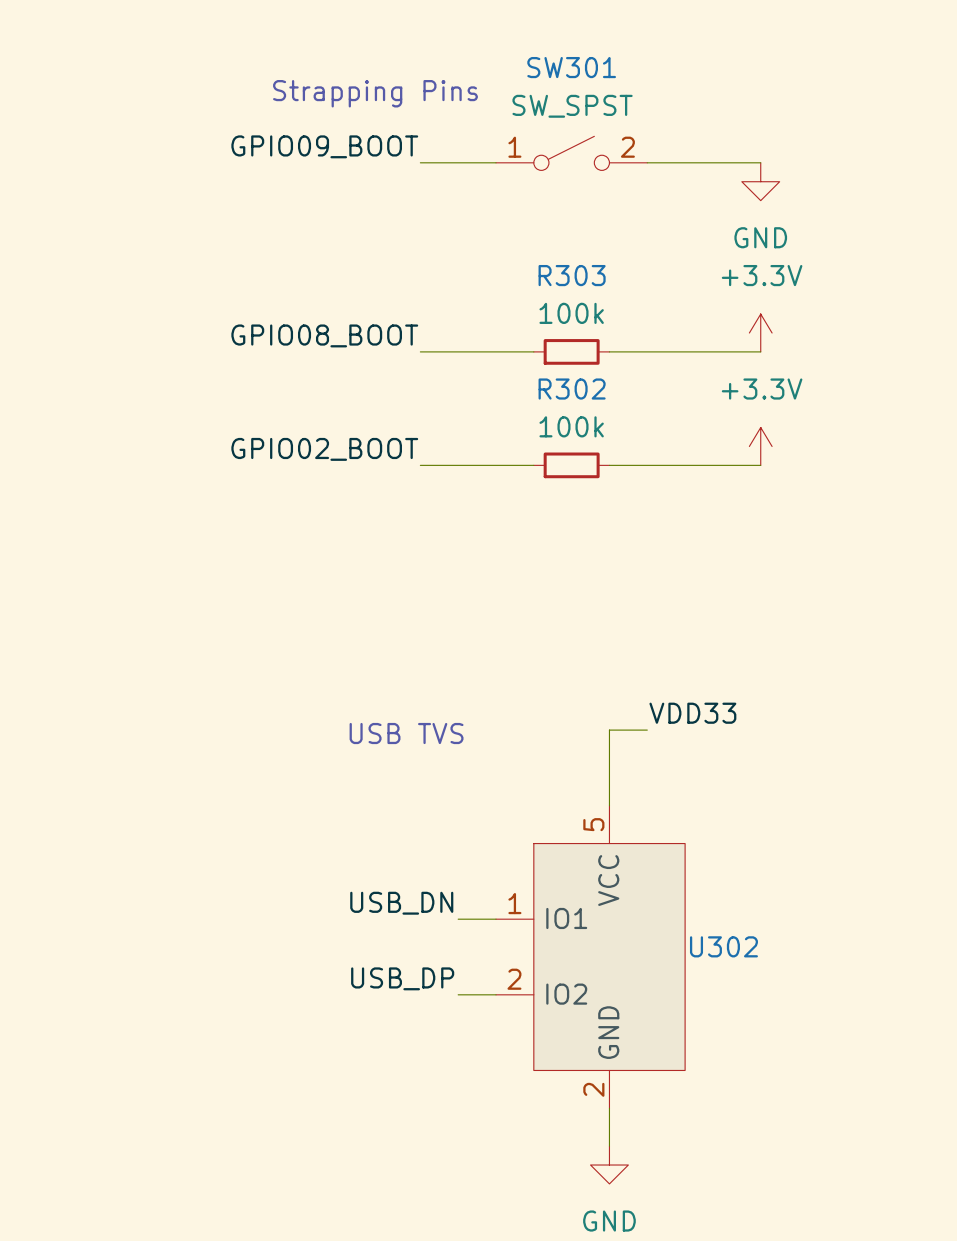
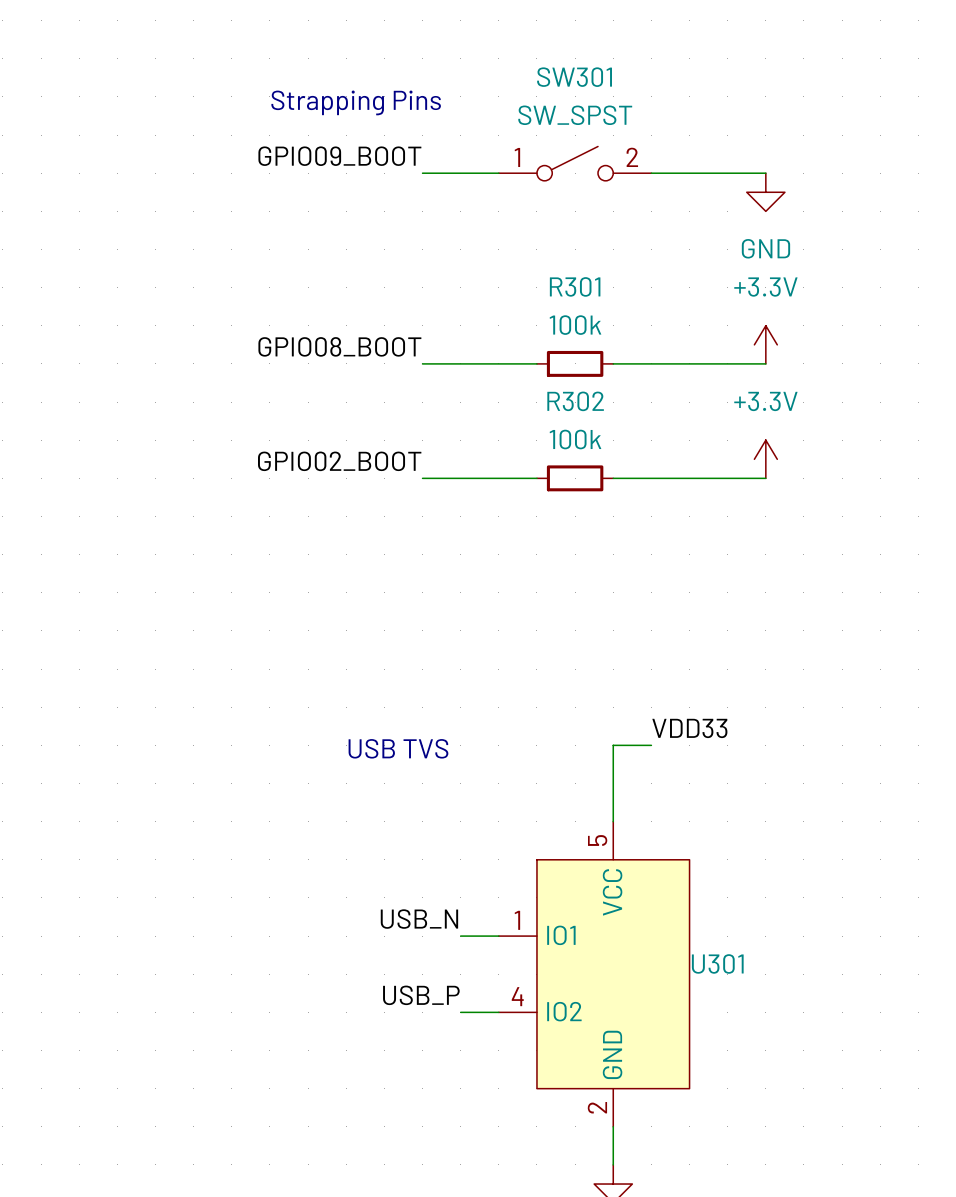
R303 name: R303 (572, 275) -> R301 (575, 286)
label: USB_DN (401, 903) -> USB_N (419, 919)
U302 name: U302 (723, 946) -> U301 (717, 963)
label: USB_DP (402, 978) -> USB_P (421, 995)
U302 pin number: 2 (514, 979) -> 4 (517, 996)

